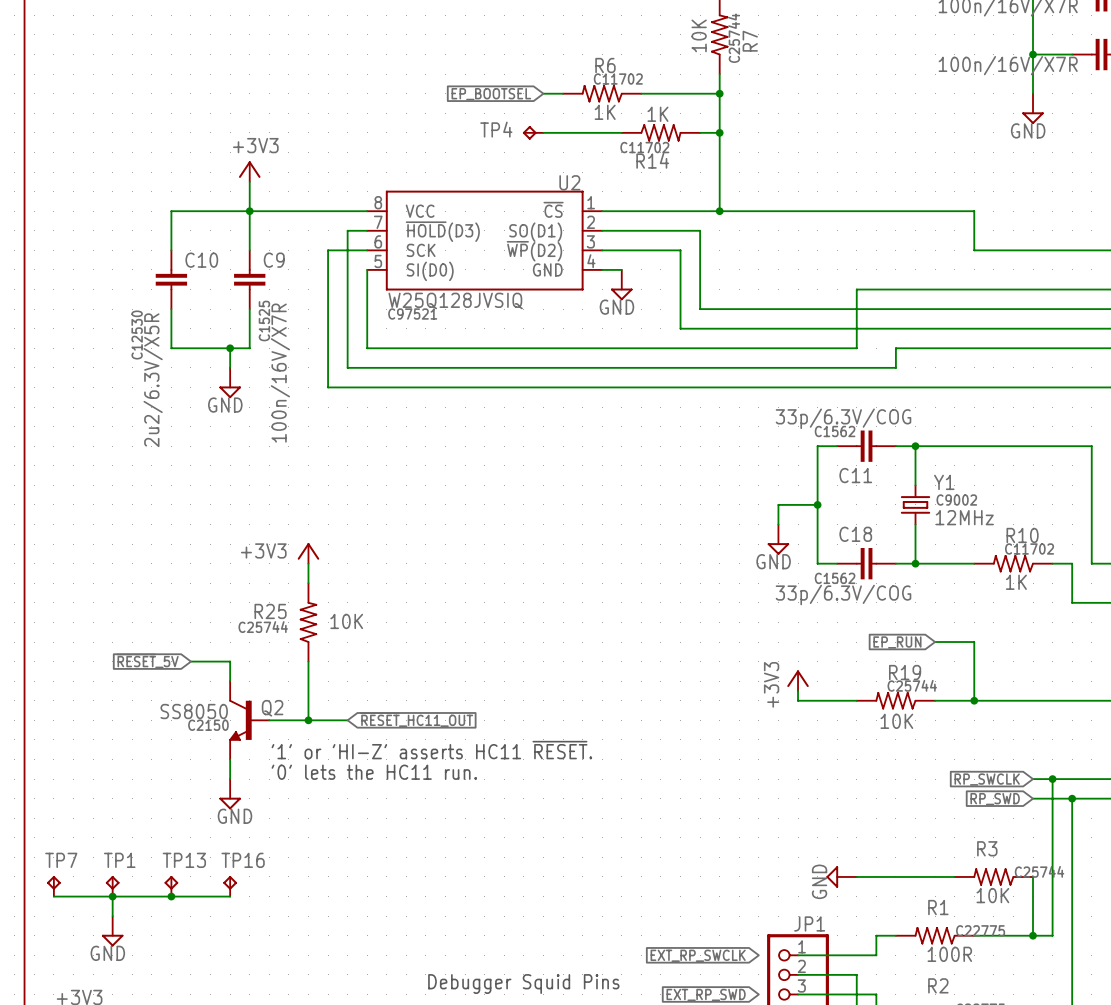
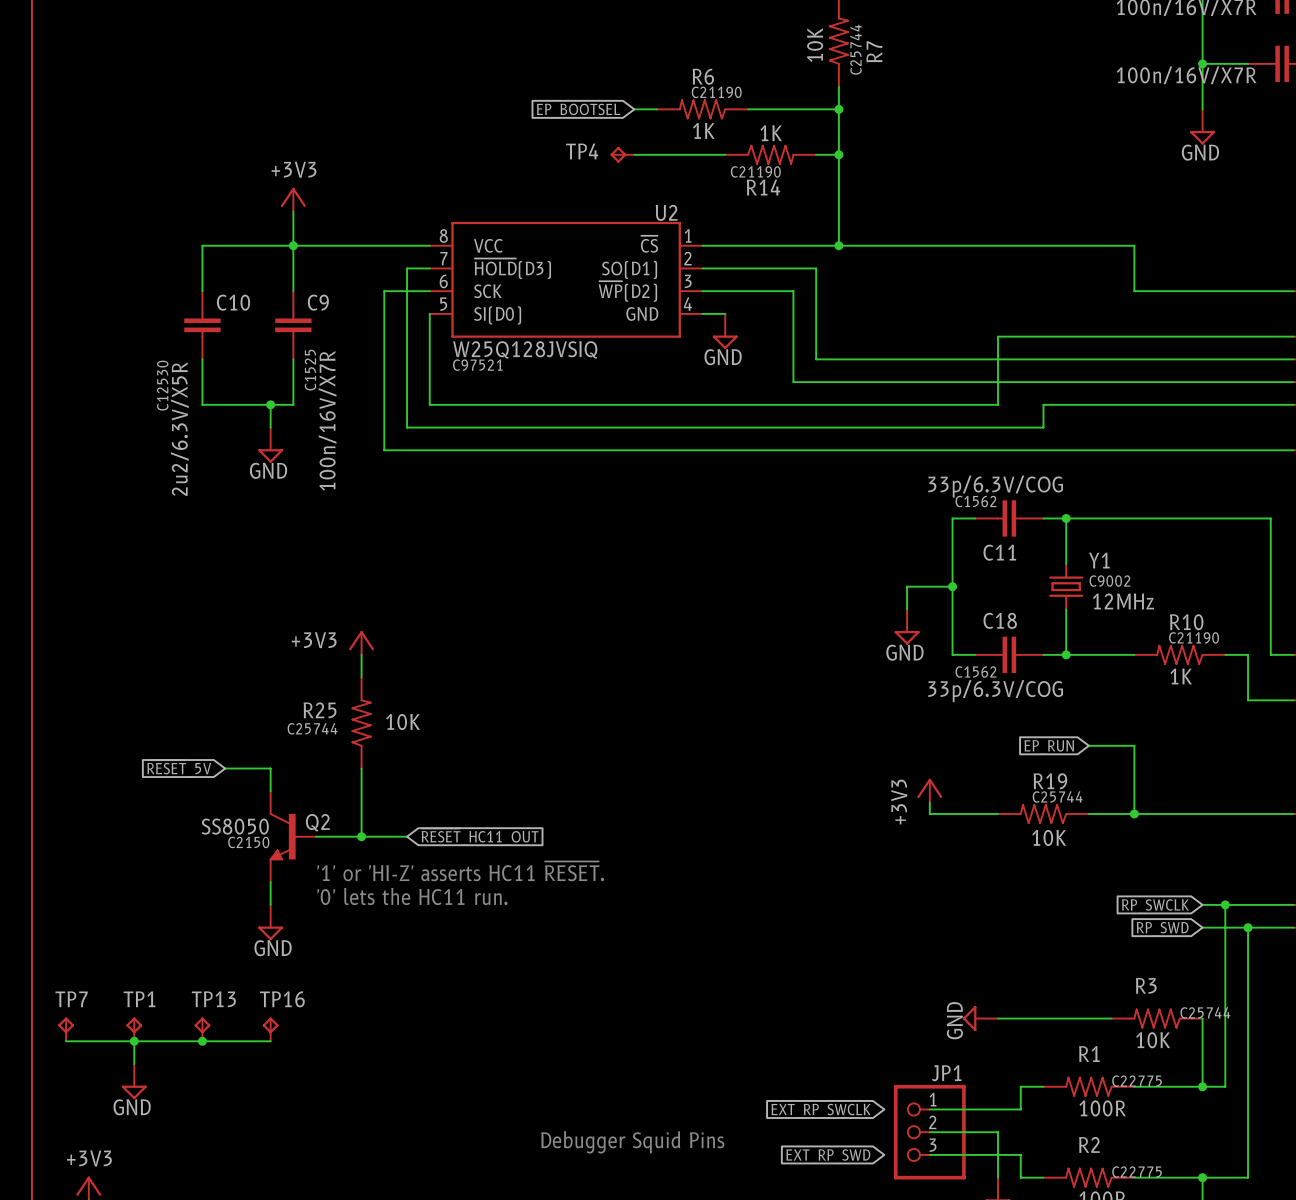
R6 text: C11702 (618, 79) -> C21190 (716, 92)
R14 text: C11702 (644, 147) -> C21190 (755, 171)
R10 text: C11702 (1029, 548) -> C21190 (1194, 637)

